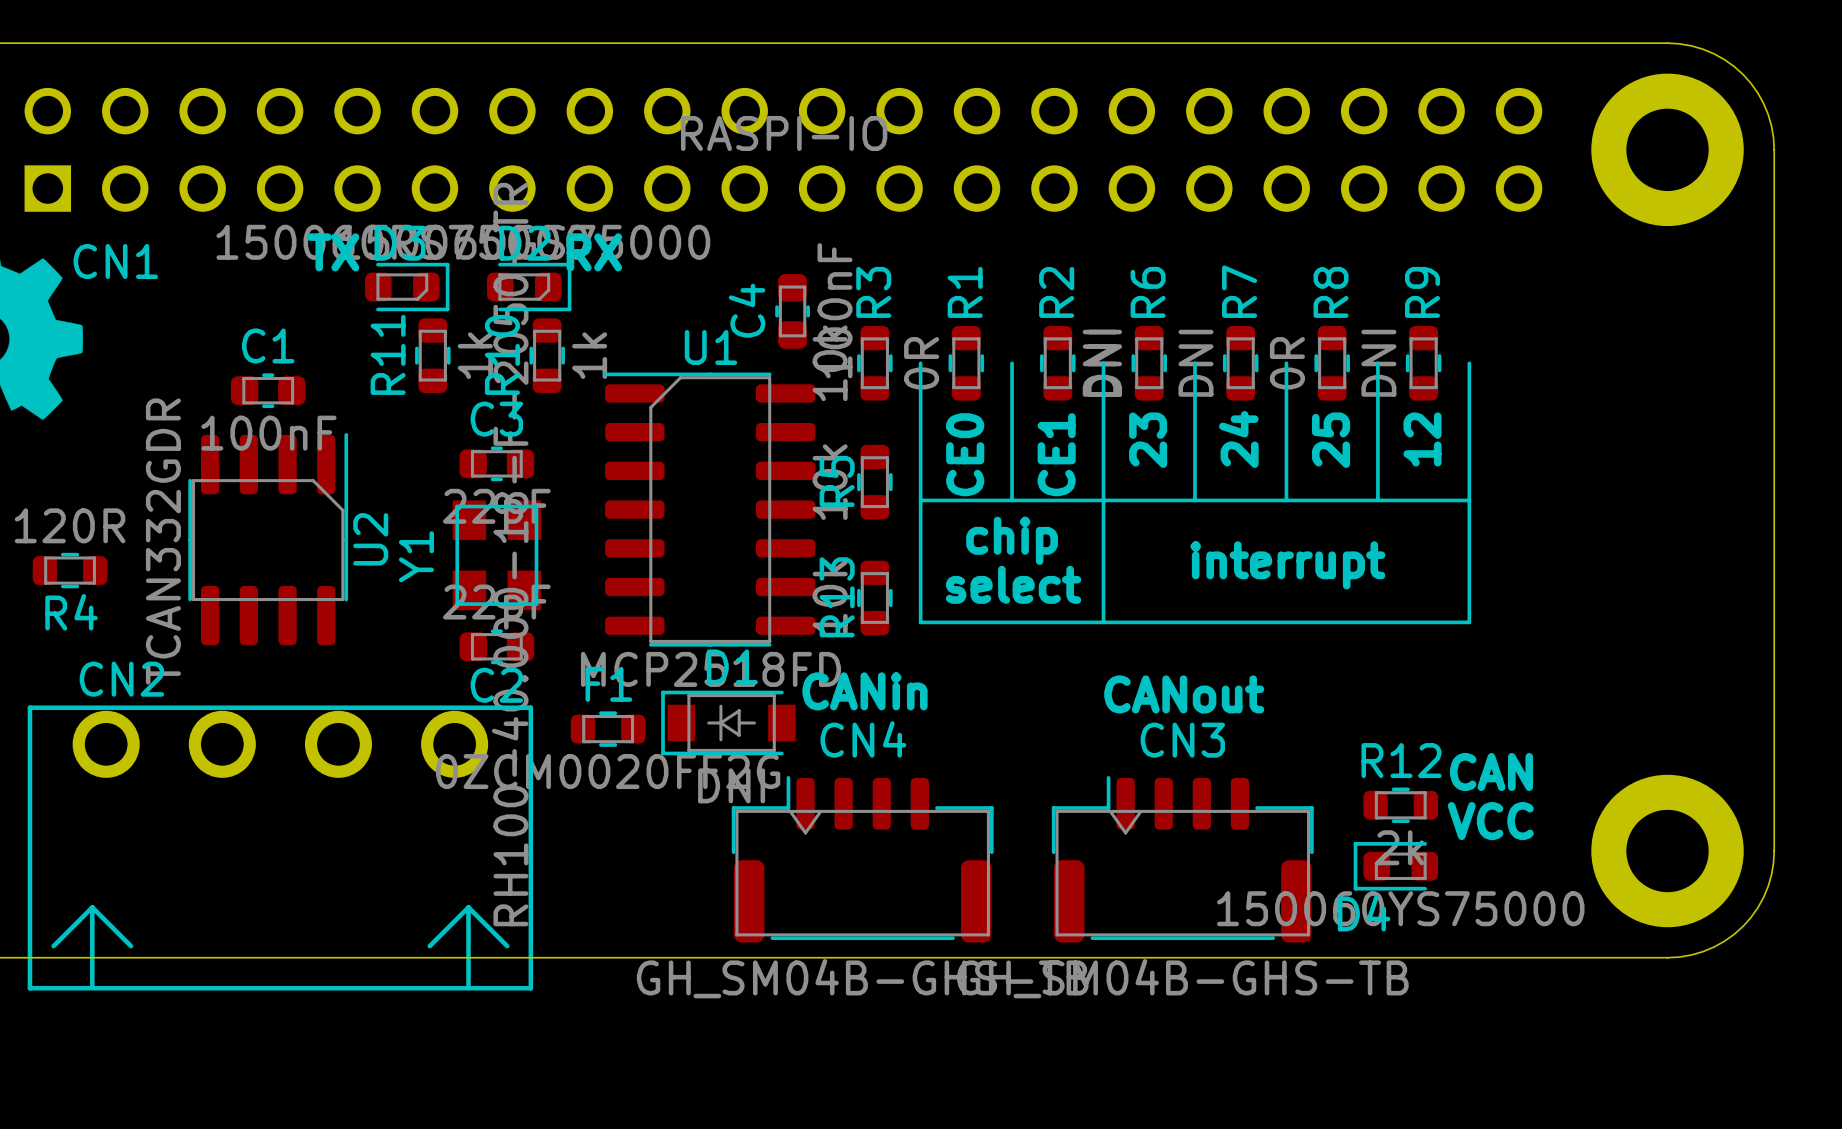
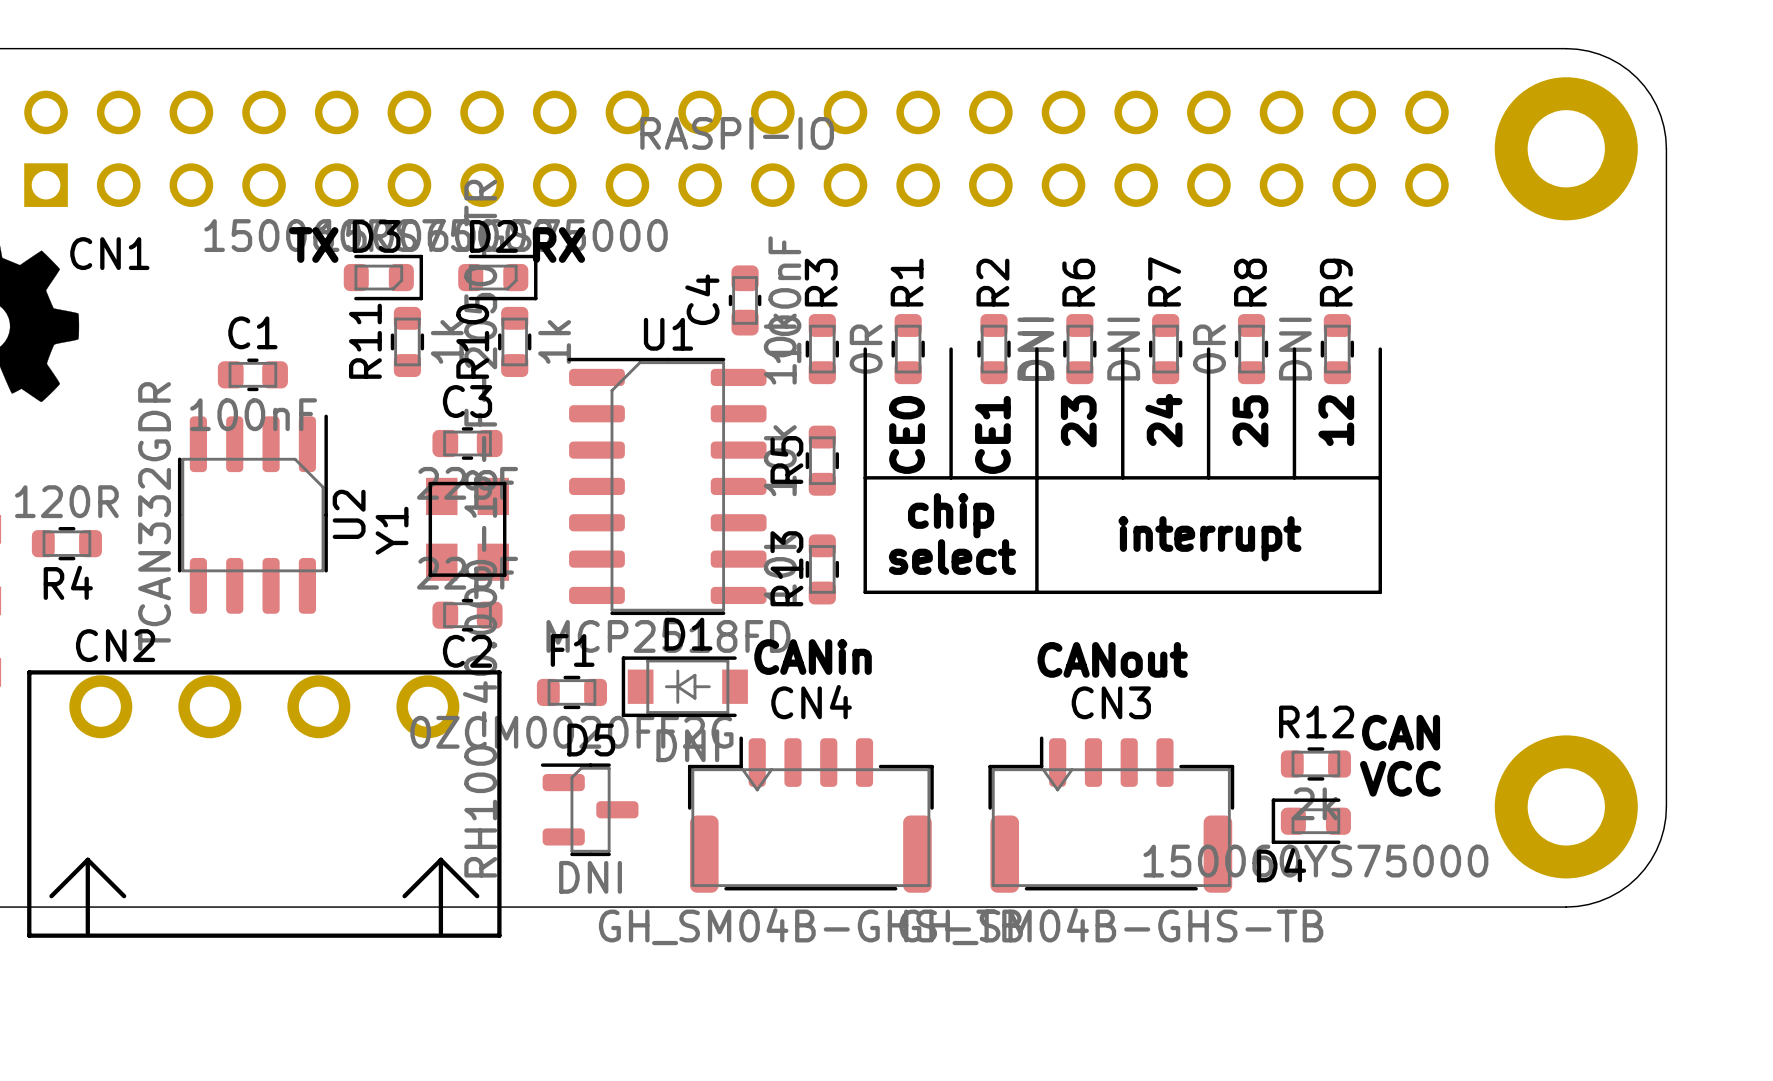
D5: none -> DNI (589, 809)

